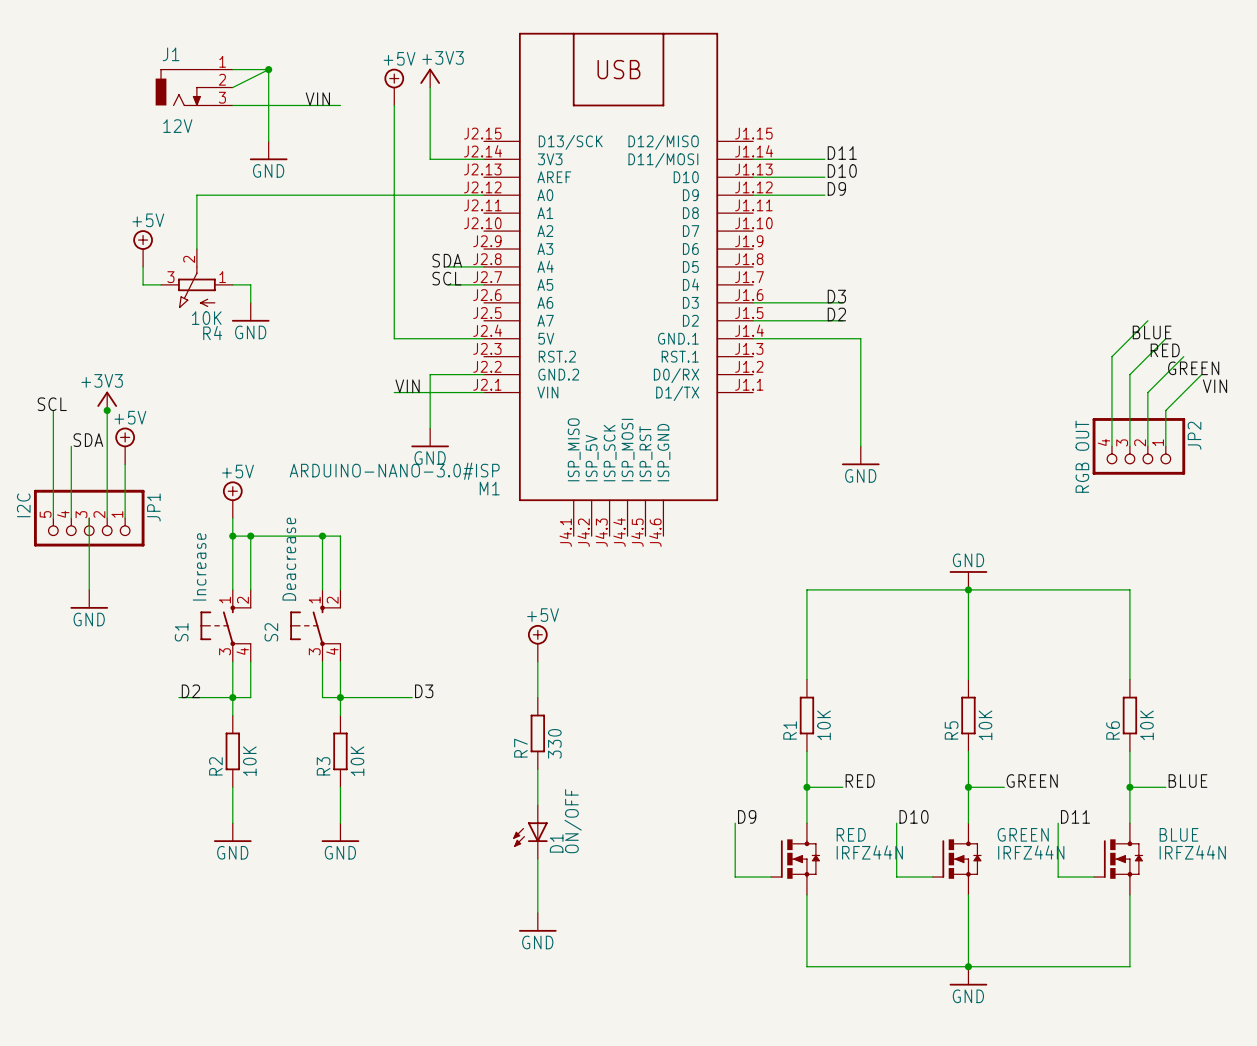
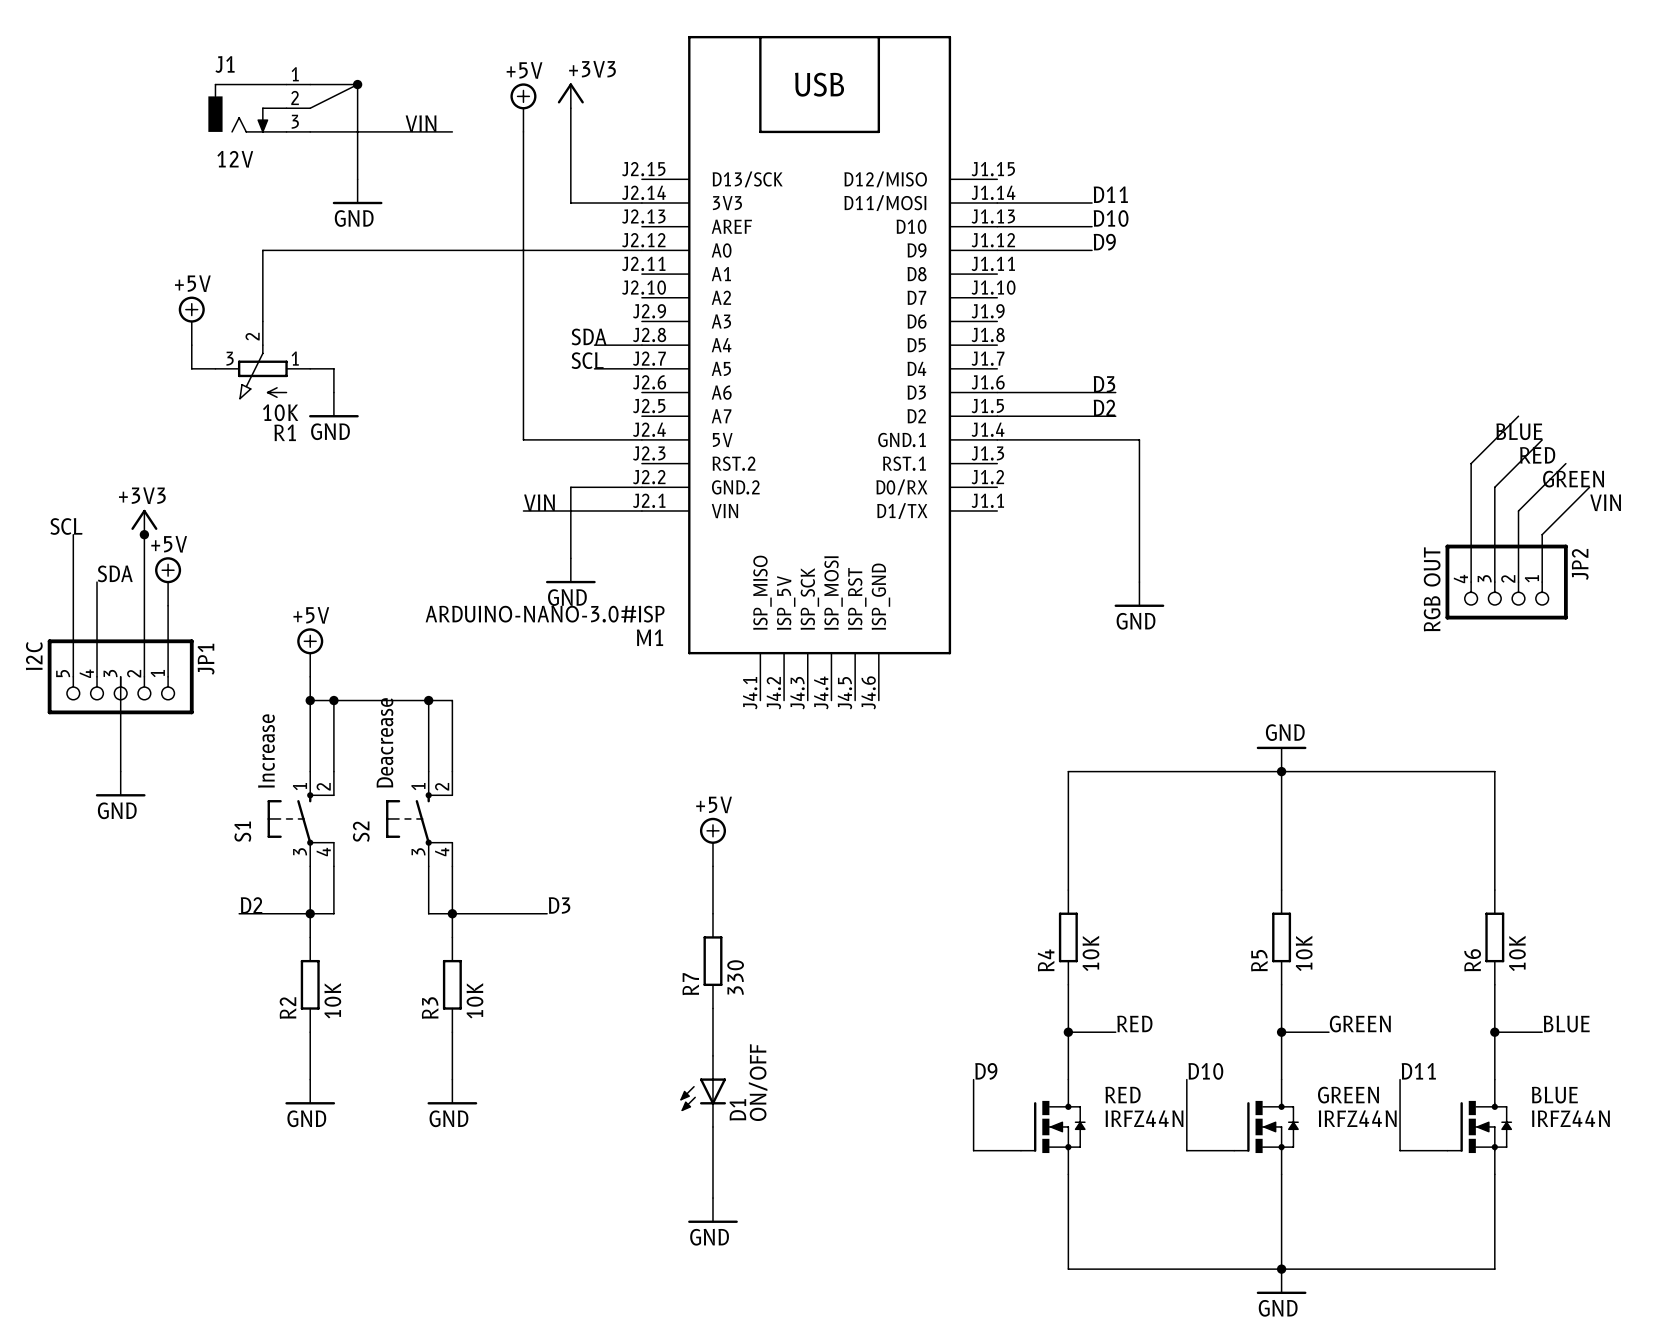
R4 name: R4 (212, 333) -> R1 (285, 432)
R1 name: R1 (790, 730) -> R4 (1046, 960)

